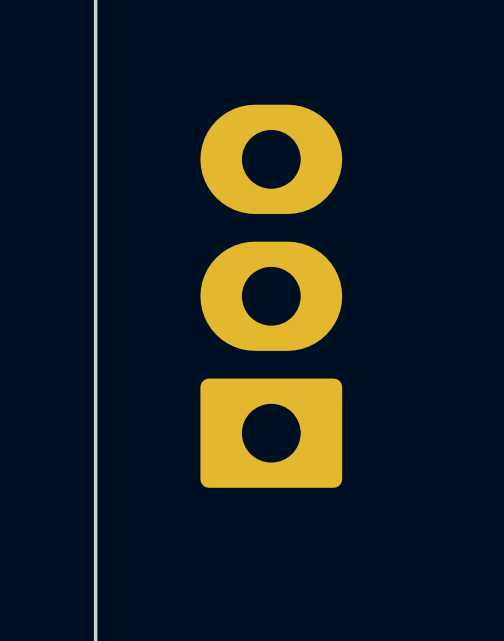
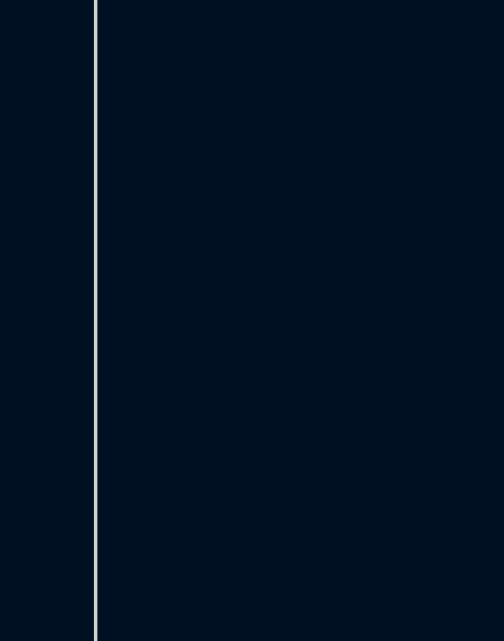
part: (271, 296) -> none

